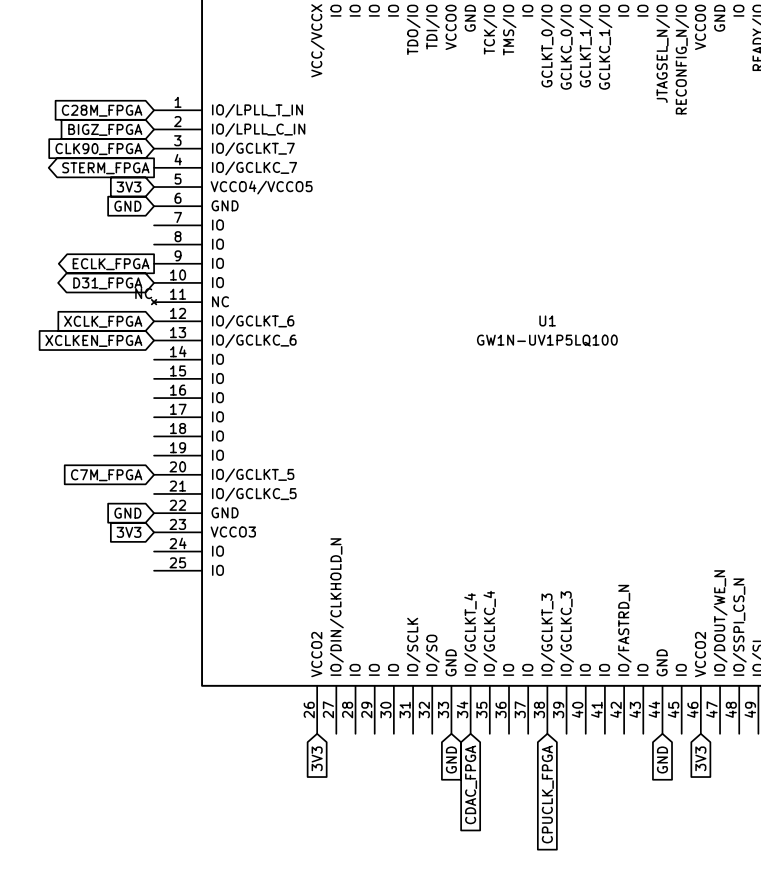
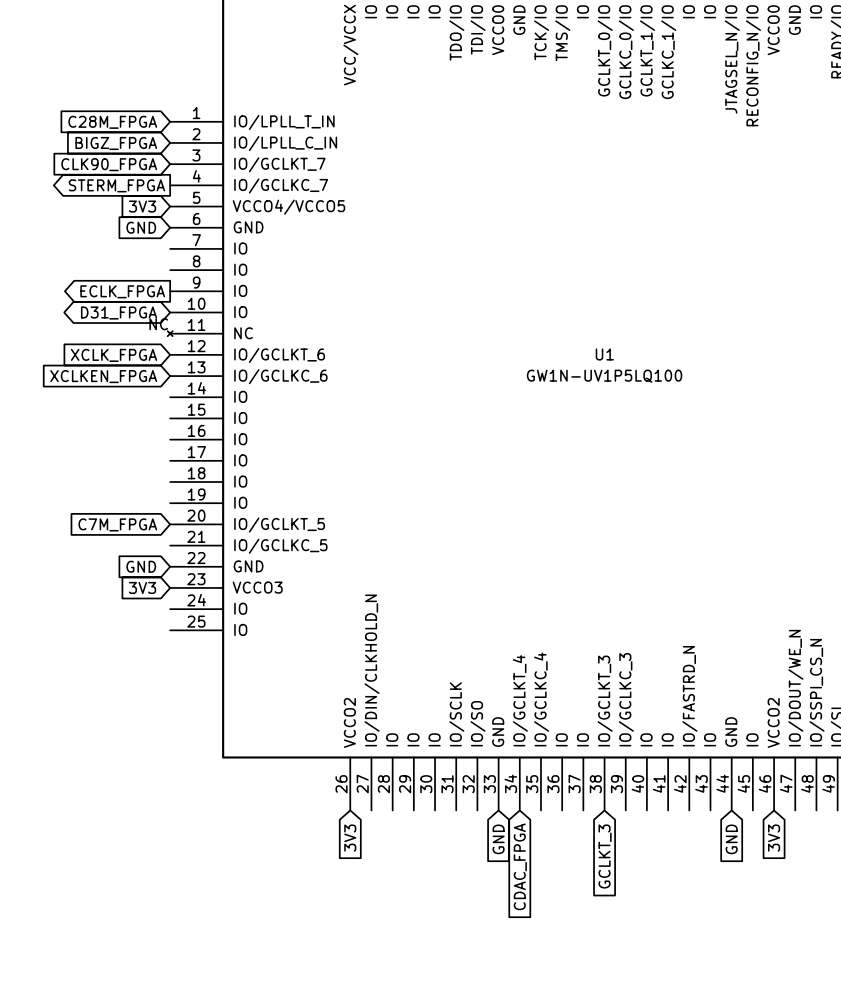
global label: CPUCLK_FPGA (547, 794) -> GCLKT_3 (605, 856)

